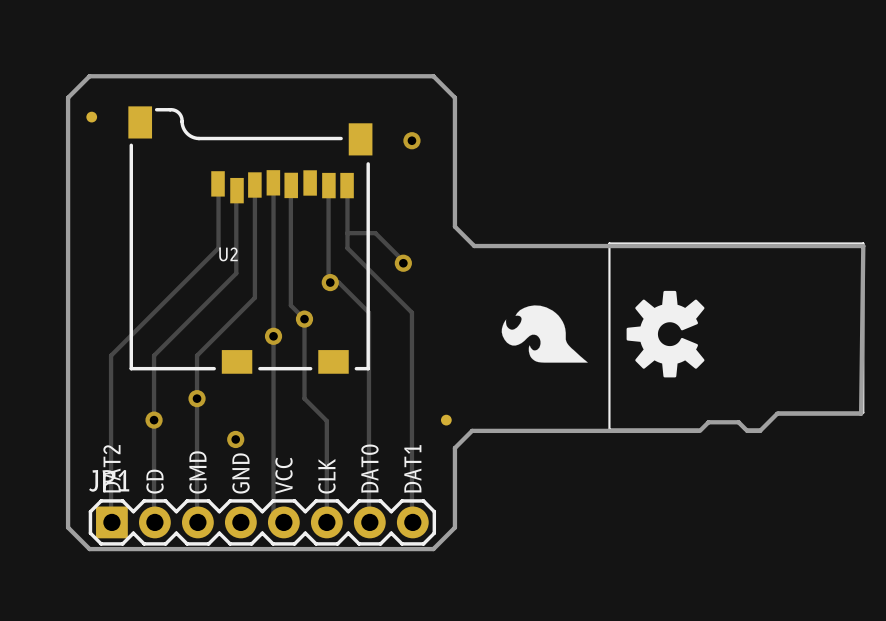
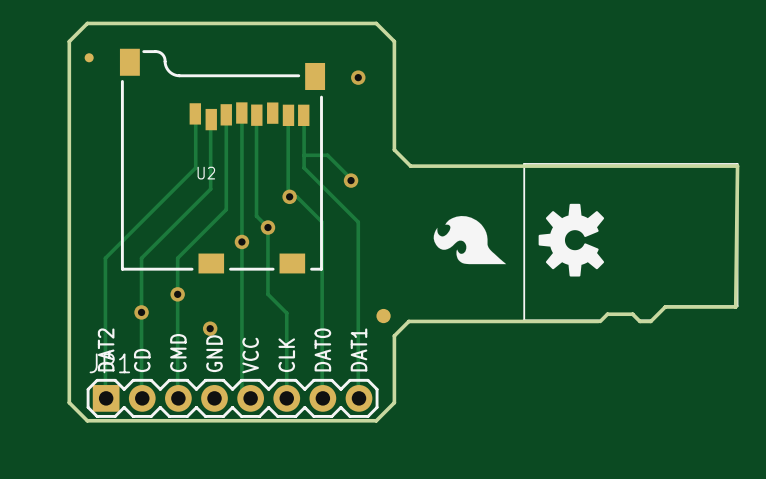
part footprint: [440, 414, 452, 426] -> [376, 308, 391, 324]

